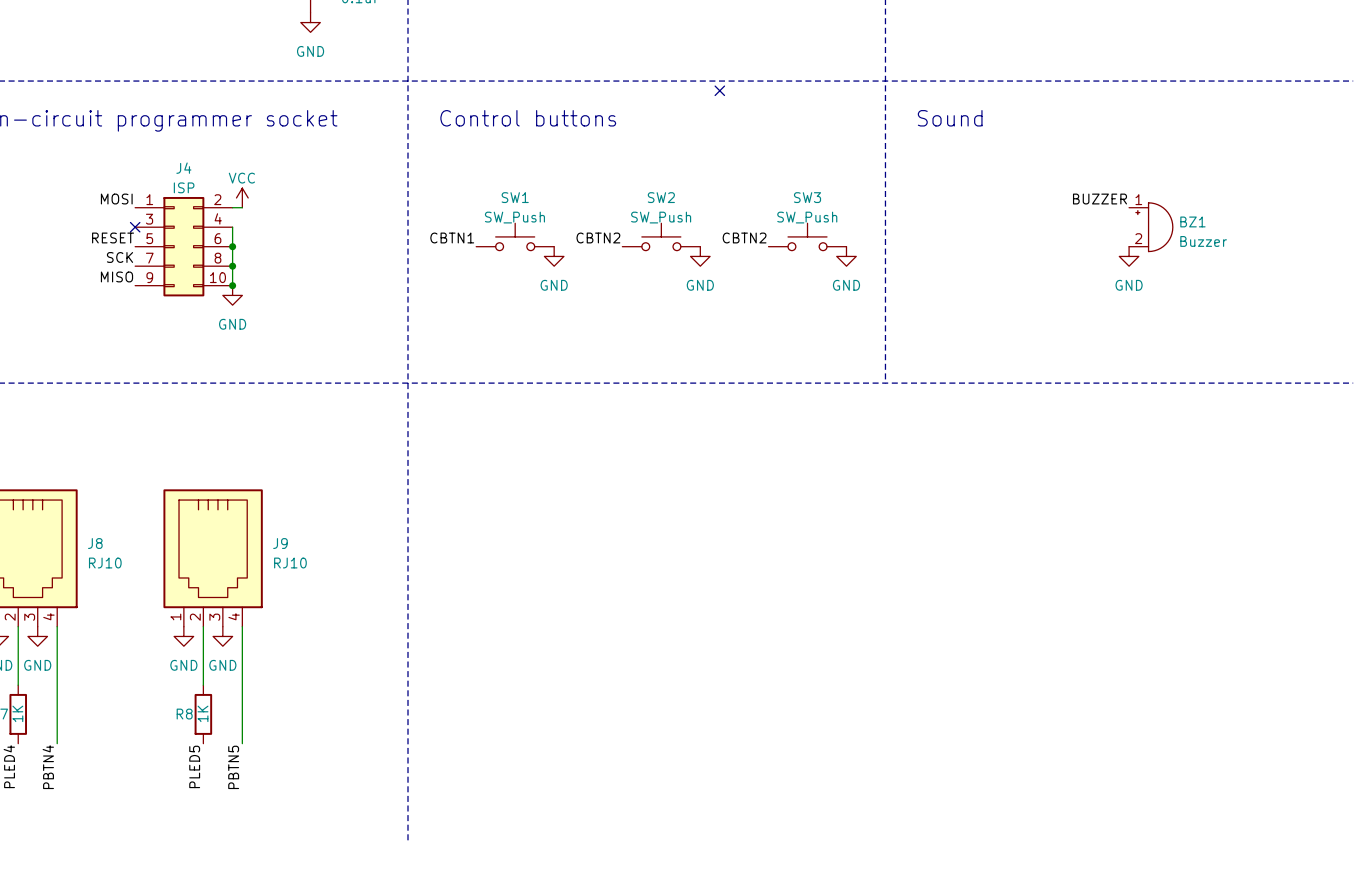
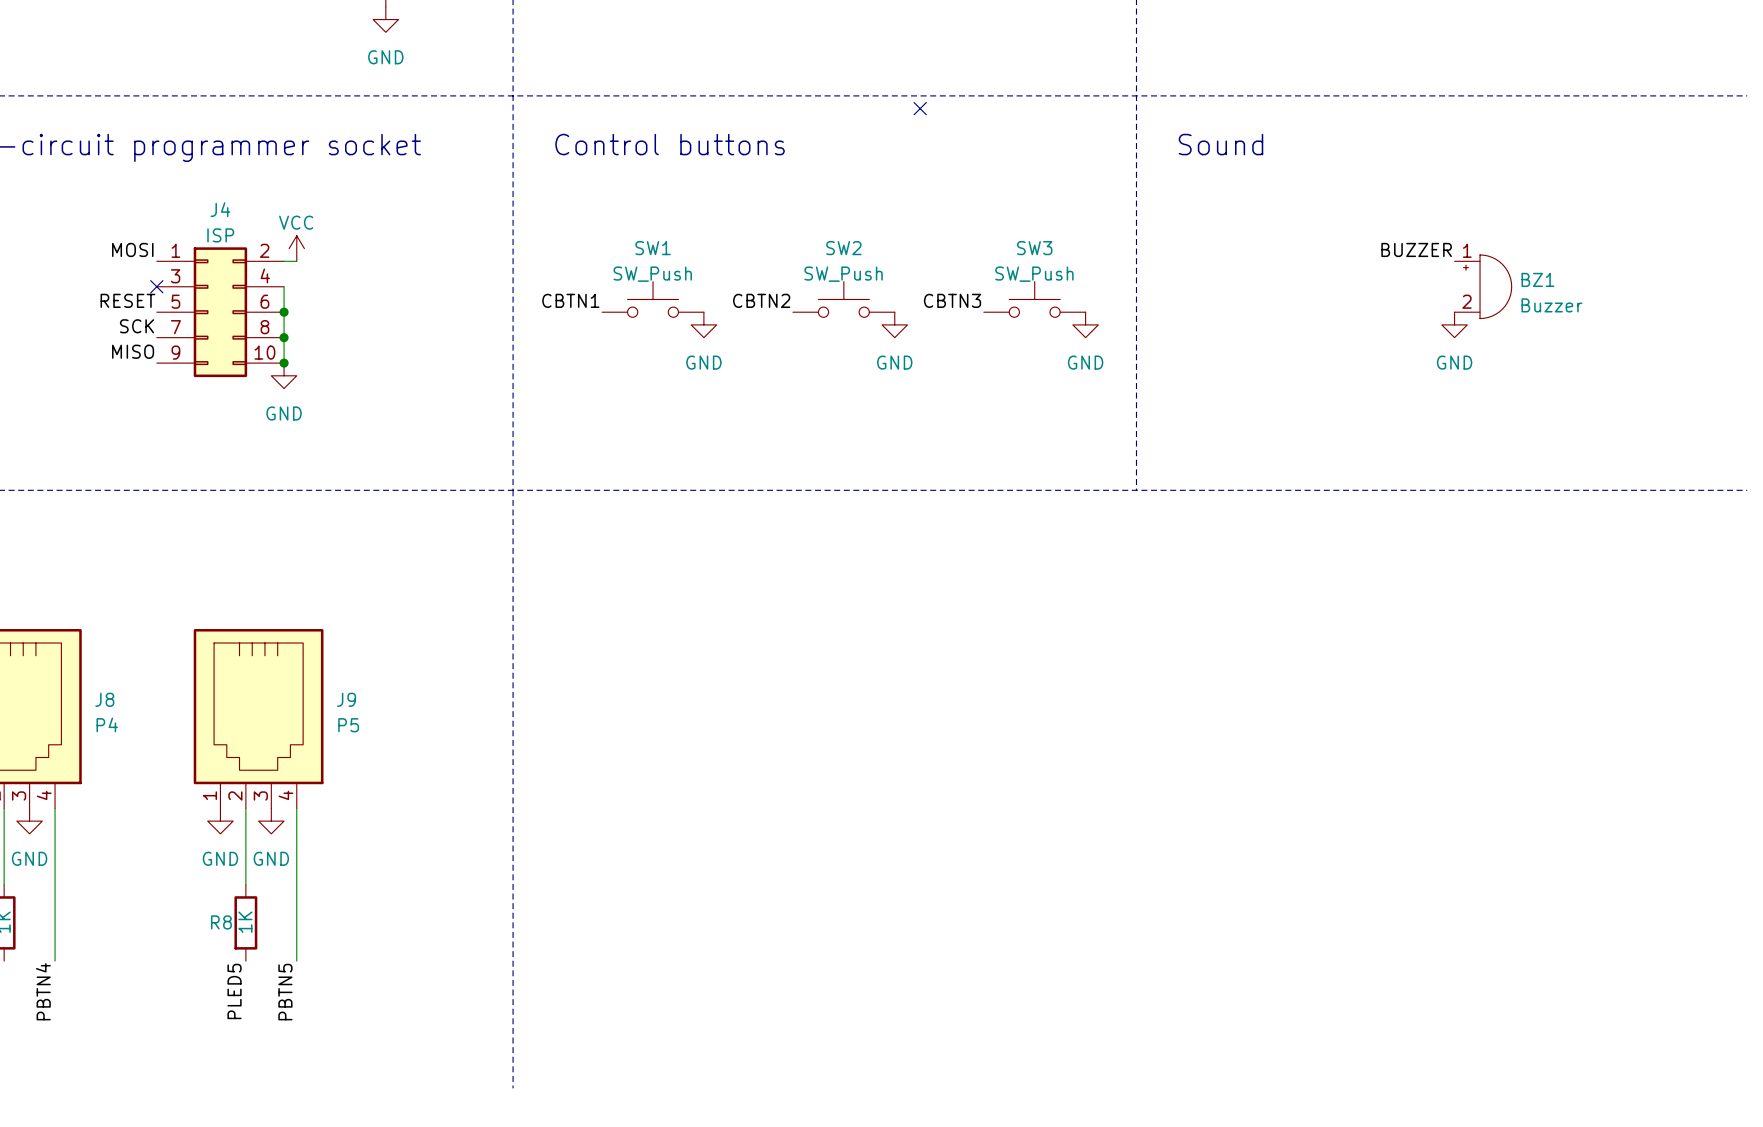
label: CBTN2 (744, 237) -> CBTN3 (952, 300)
J8 value: RJ10 (105, 563) -> P4 (107, 724)
J9 value: RJ10 (290, 563) -> P5 (348, 725)

